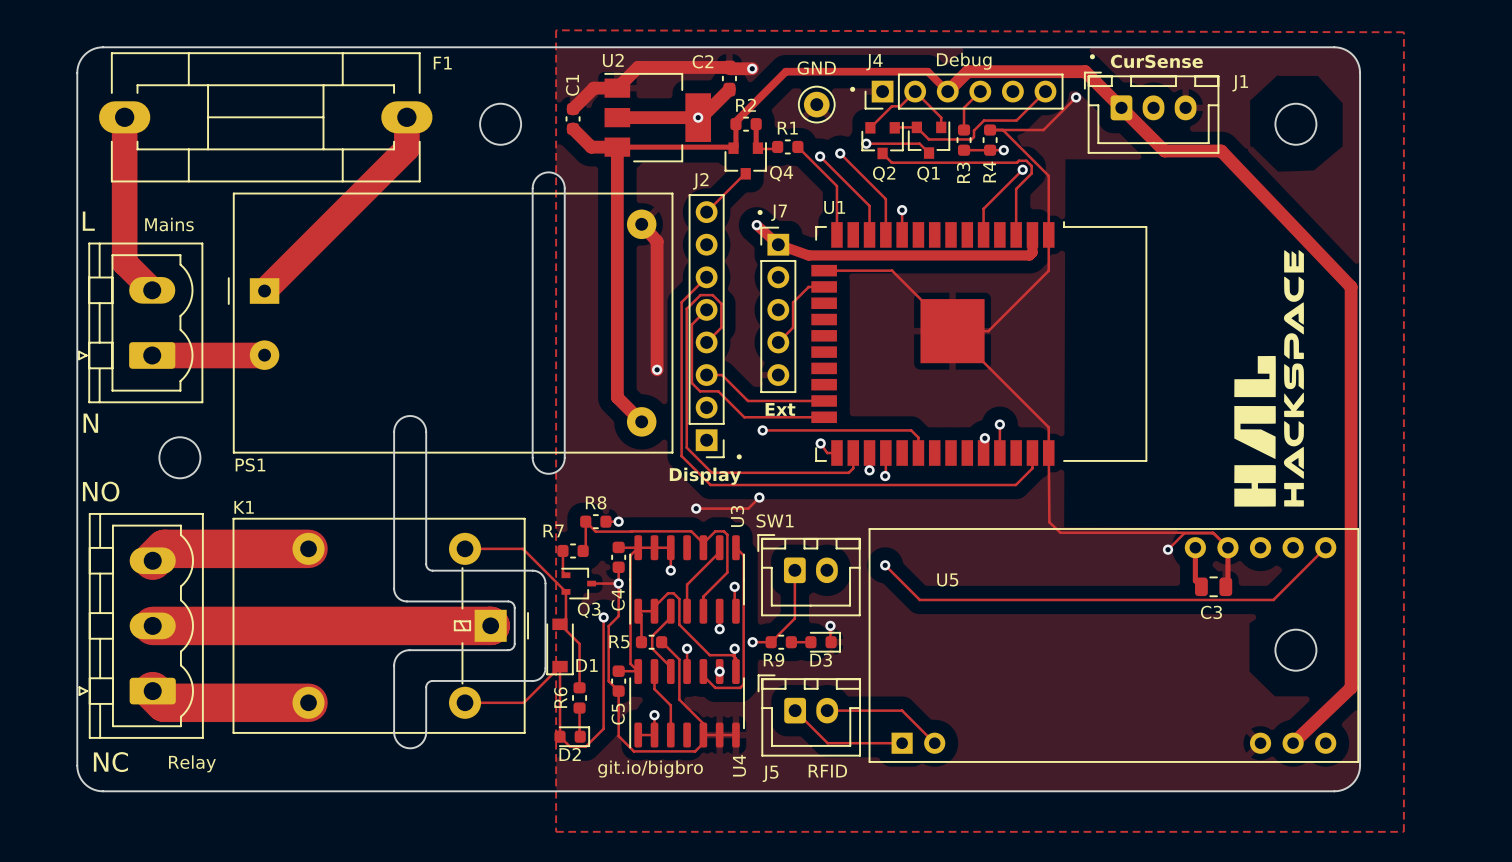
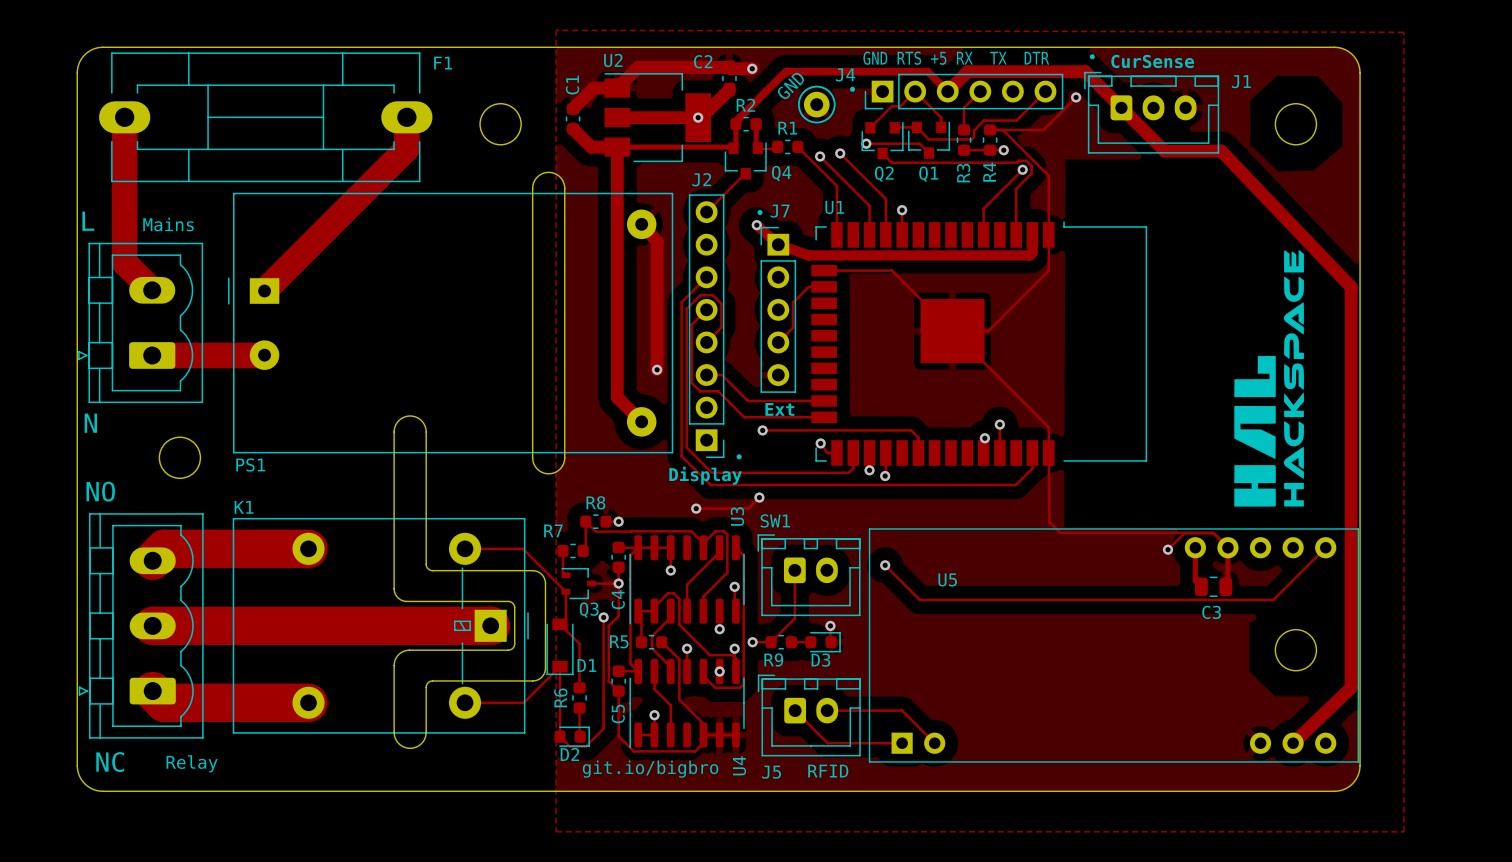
text: none -> GND RTS +5 RX TX DTR (956, 58)
J4 value: Debug (964, 61) -> none
J4 name position: J4 (874, 62) -> J4 (845, 74)
text rotation: 0° (816, 67) -> 45° counterclockwise (790, 85)

